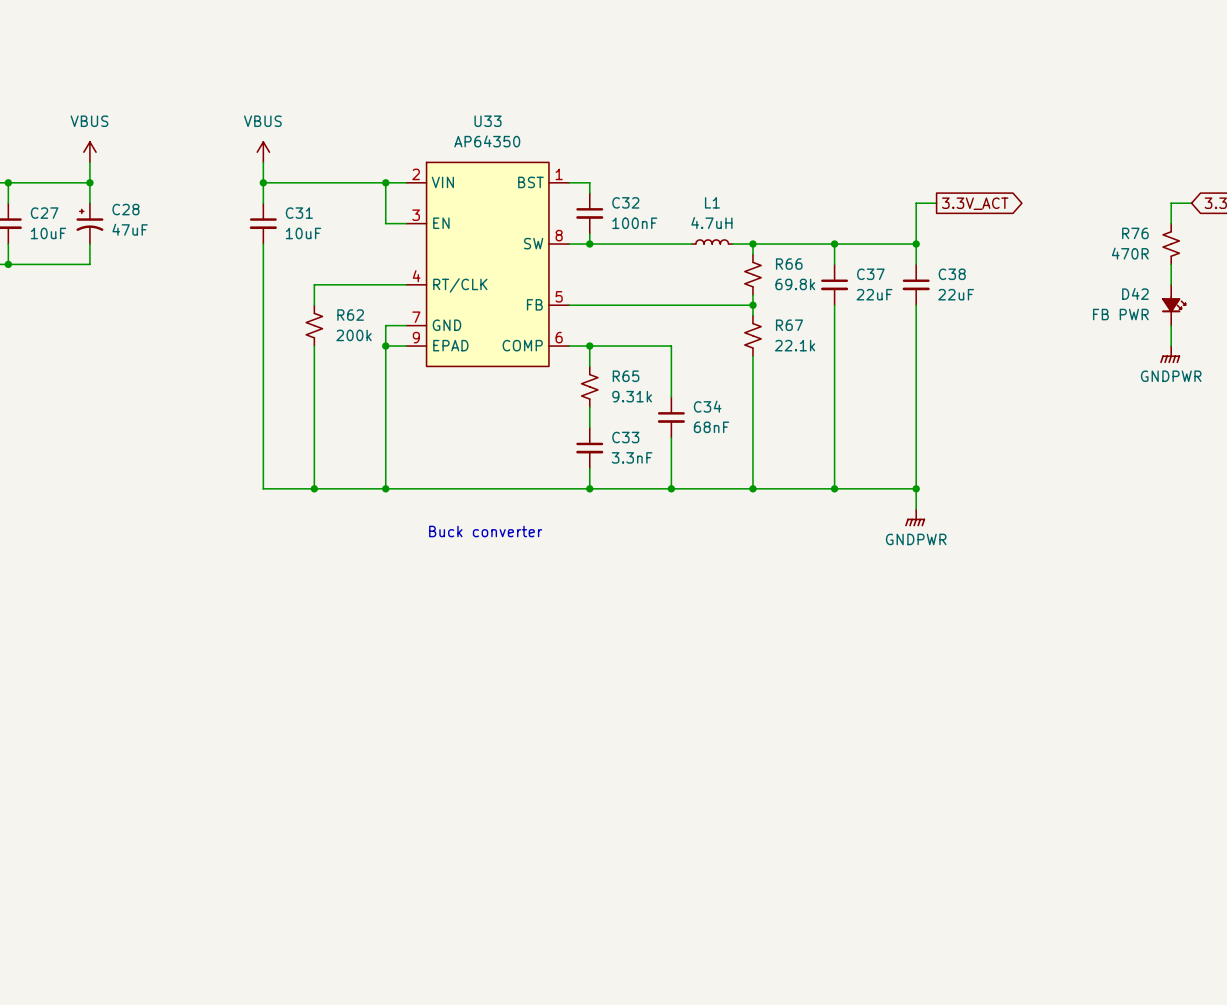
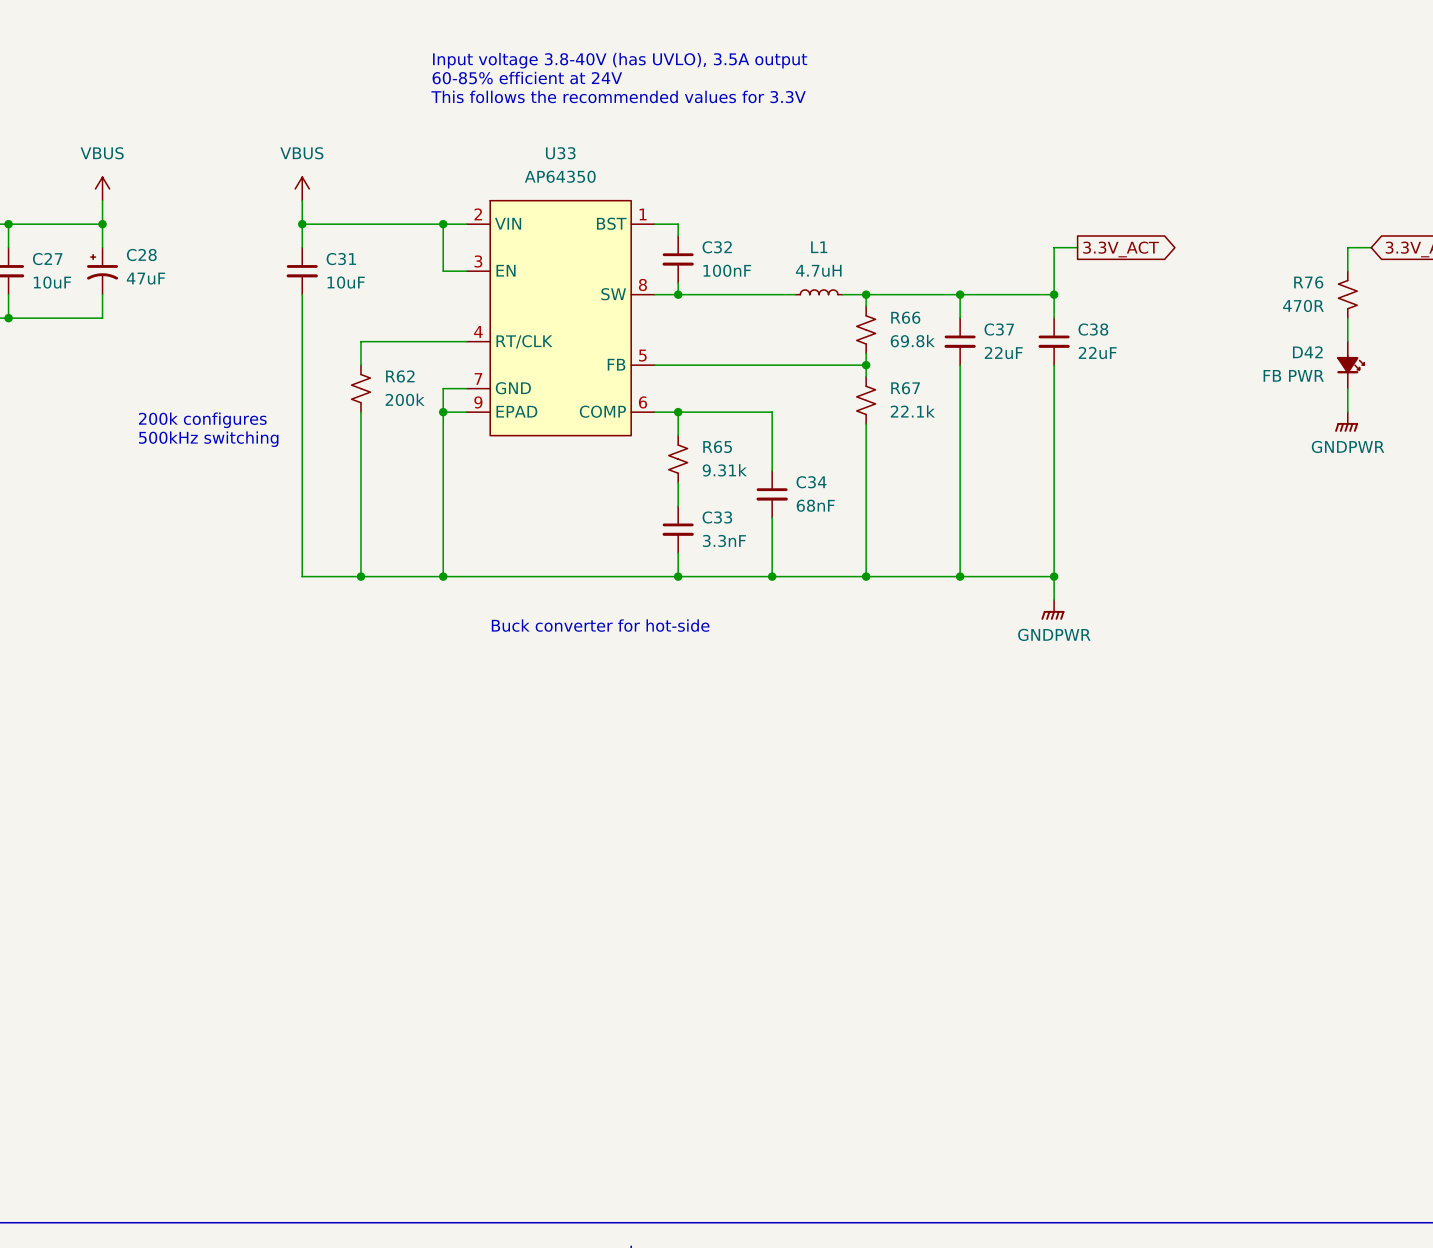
text: none -> Input voltage 3.8-40V (has UVLO), 3.5A output (620, 60)
text: none -> 60-85% efficient at 24V (527, 78)
text: none -> This follows the recommended values for 3.3V (618, 96)
text: none -> 200k configures (202, 420)
text: none -> 500kHz switching (208, 439)
text: Buck converter (485, 531) -> Buck converter for hot-side (600, 625)

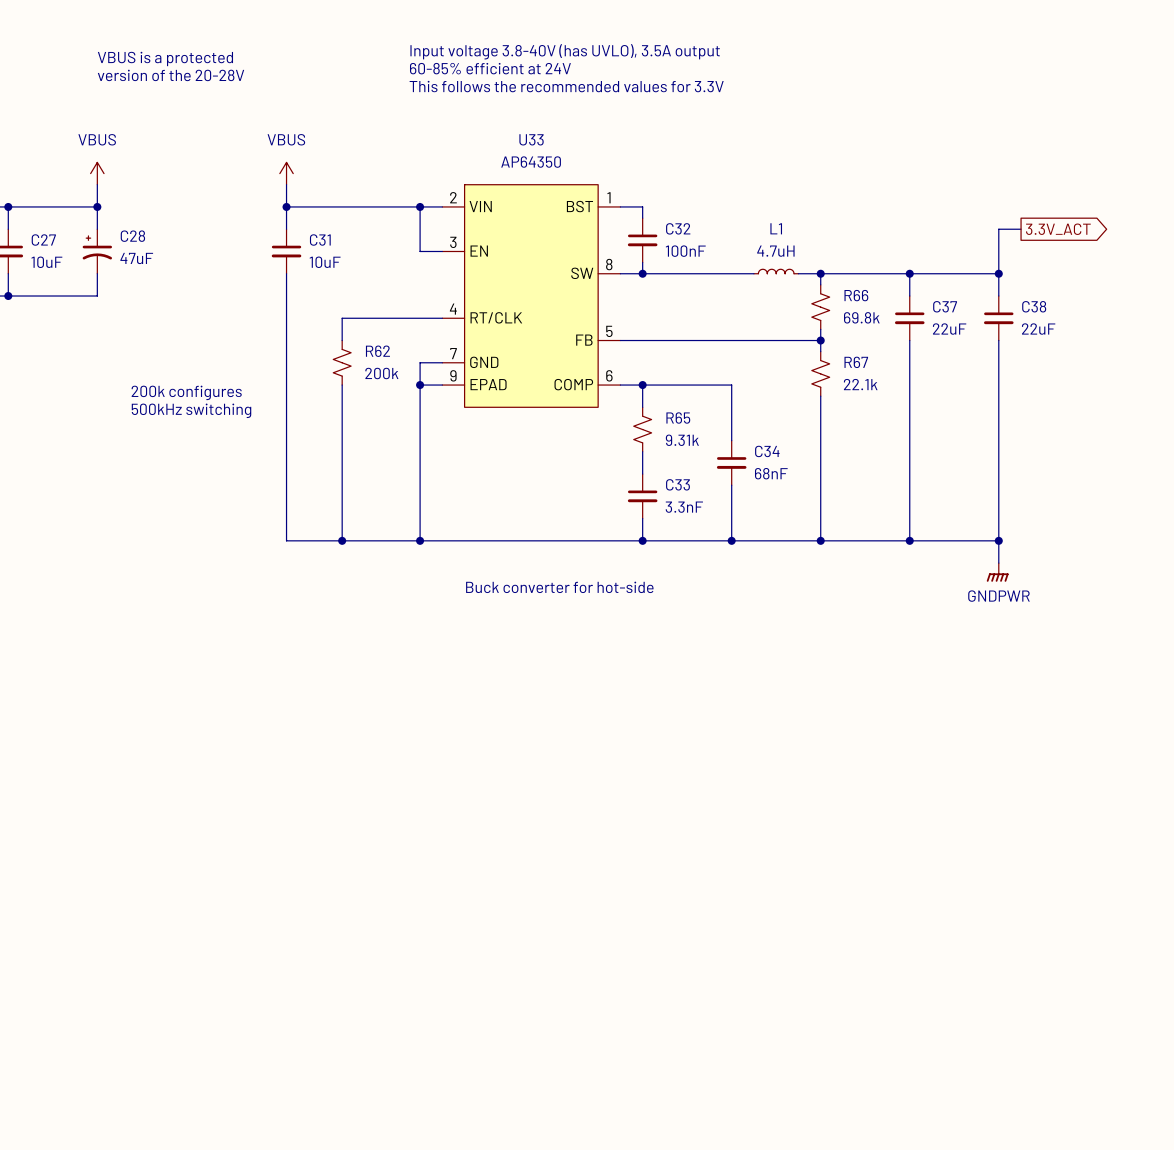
text: none -> VBUS is a protected (165, 58)
text: none -> version of the 20-28V (171, 75)

